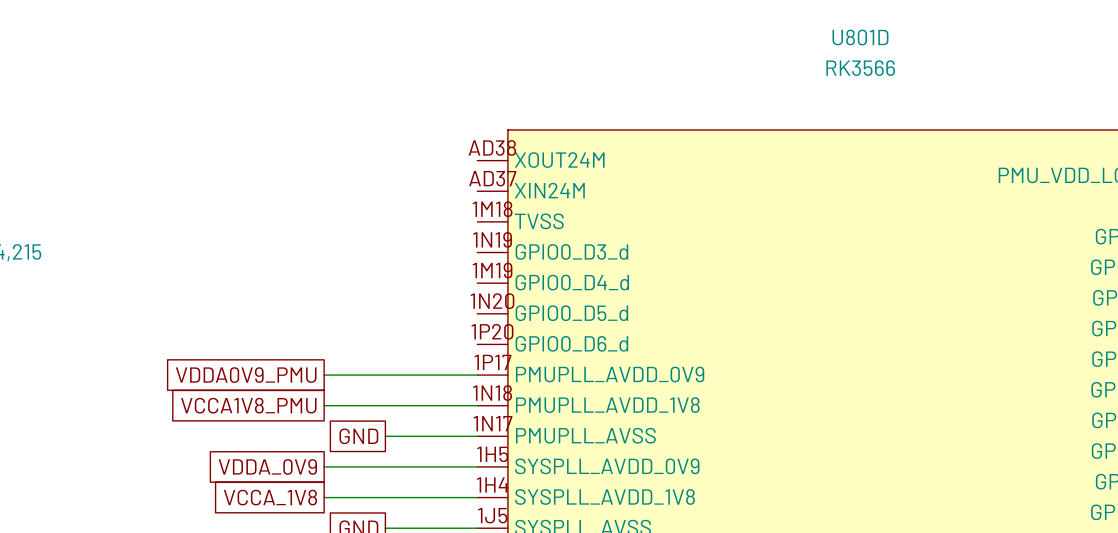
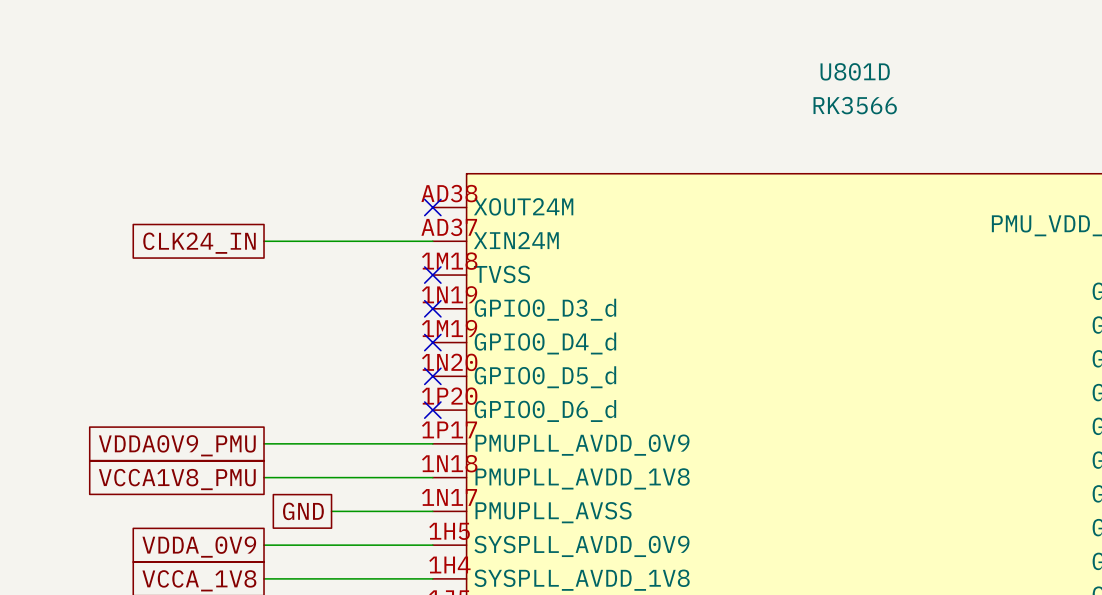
no-connect mark: none -> (432, 207)
global label: none -> CLK24_IN (199, 243)
wire: none -> (264, 241) (432, 241)
no-connect mark: none -> (432, 275)
no-connect mark: none -> (432, 308)
no-connect mark: none -> (432, 342)
no-connect mark: none -> (432, 376)
no-connect mark: none -> (432, 410)

